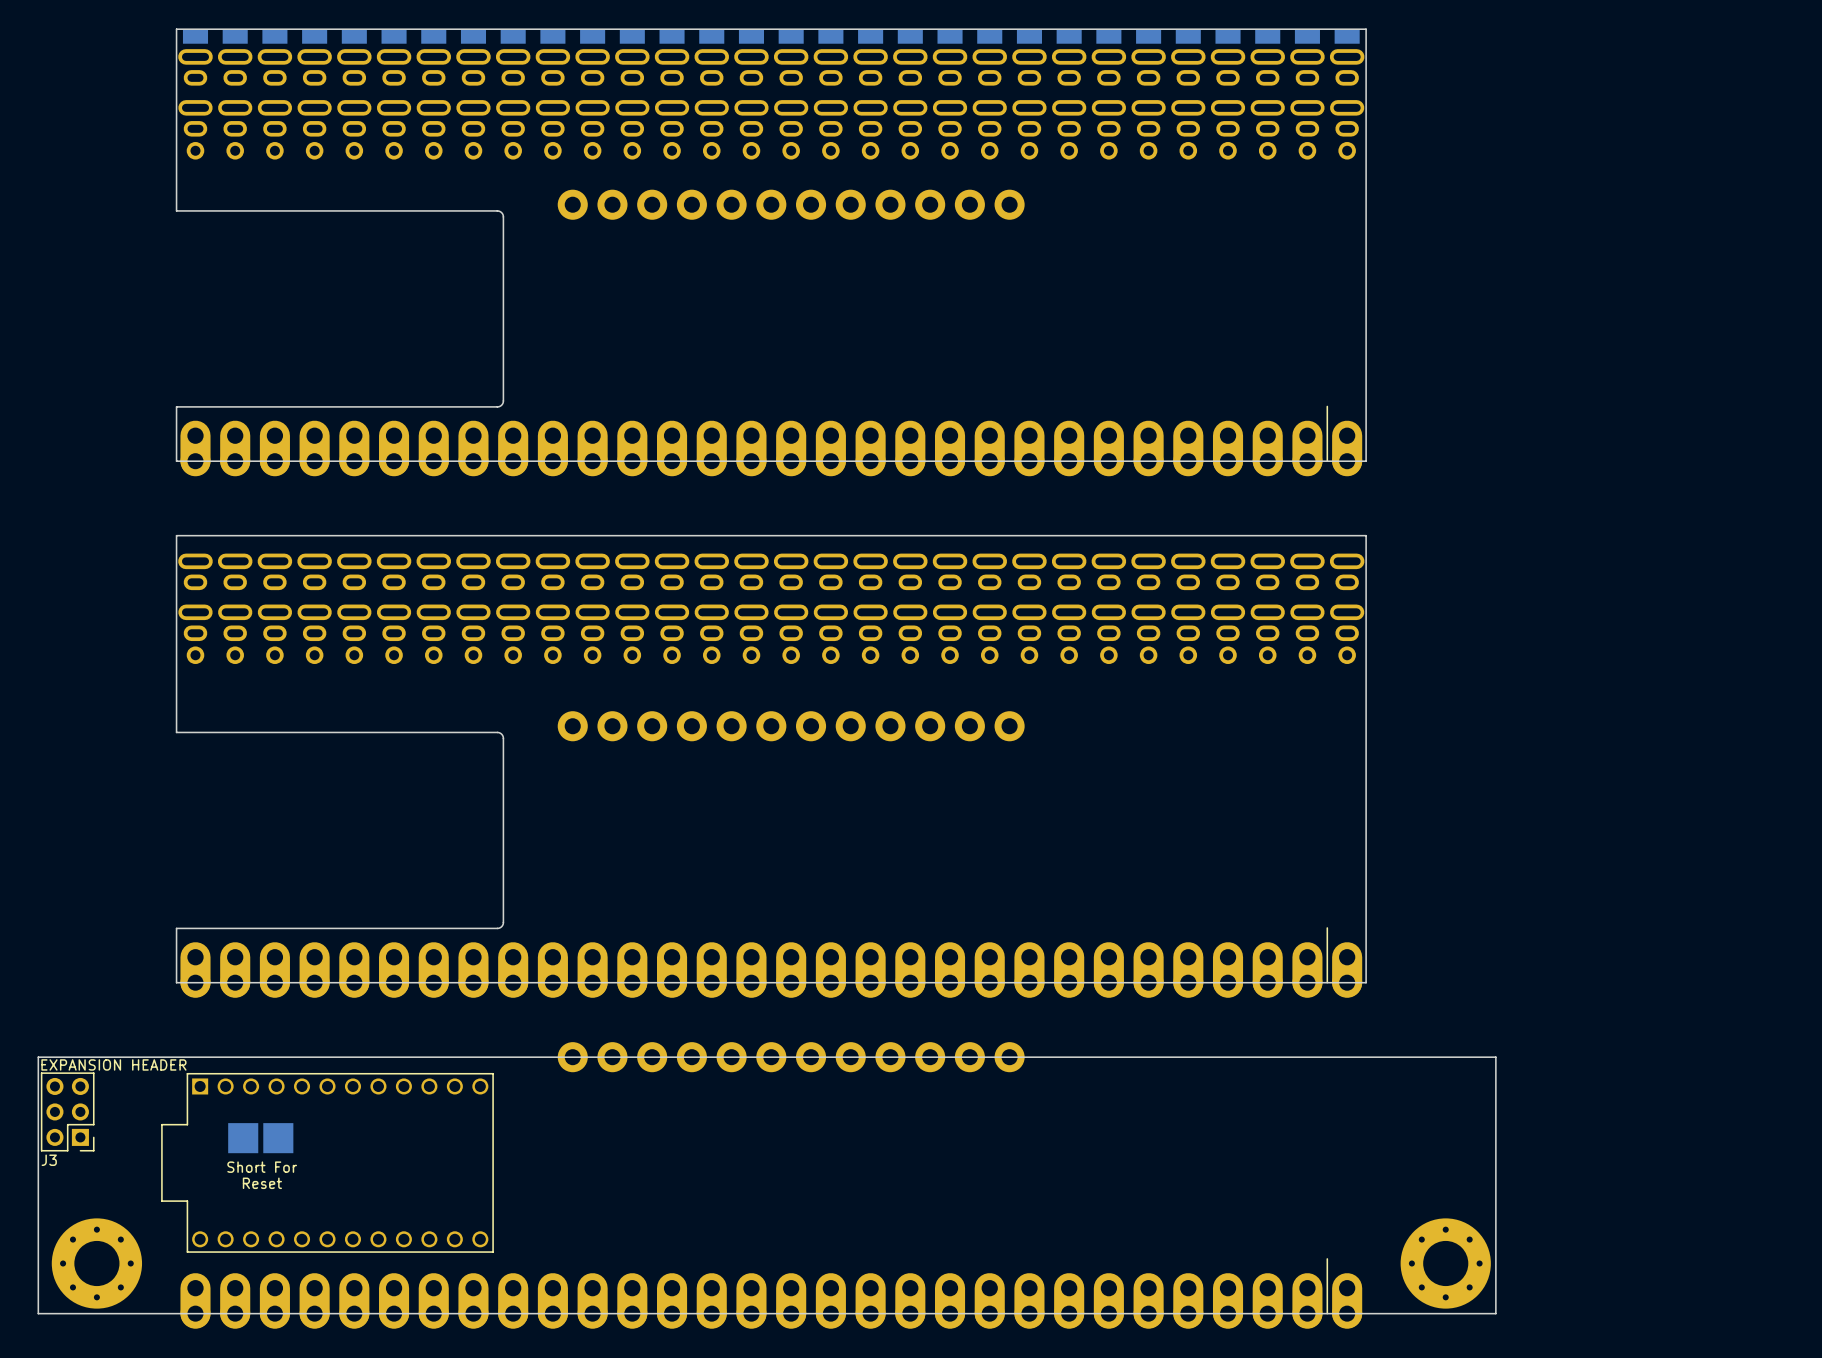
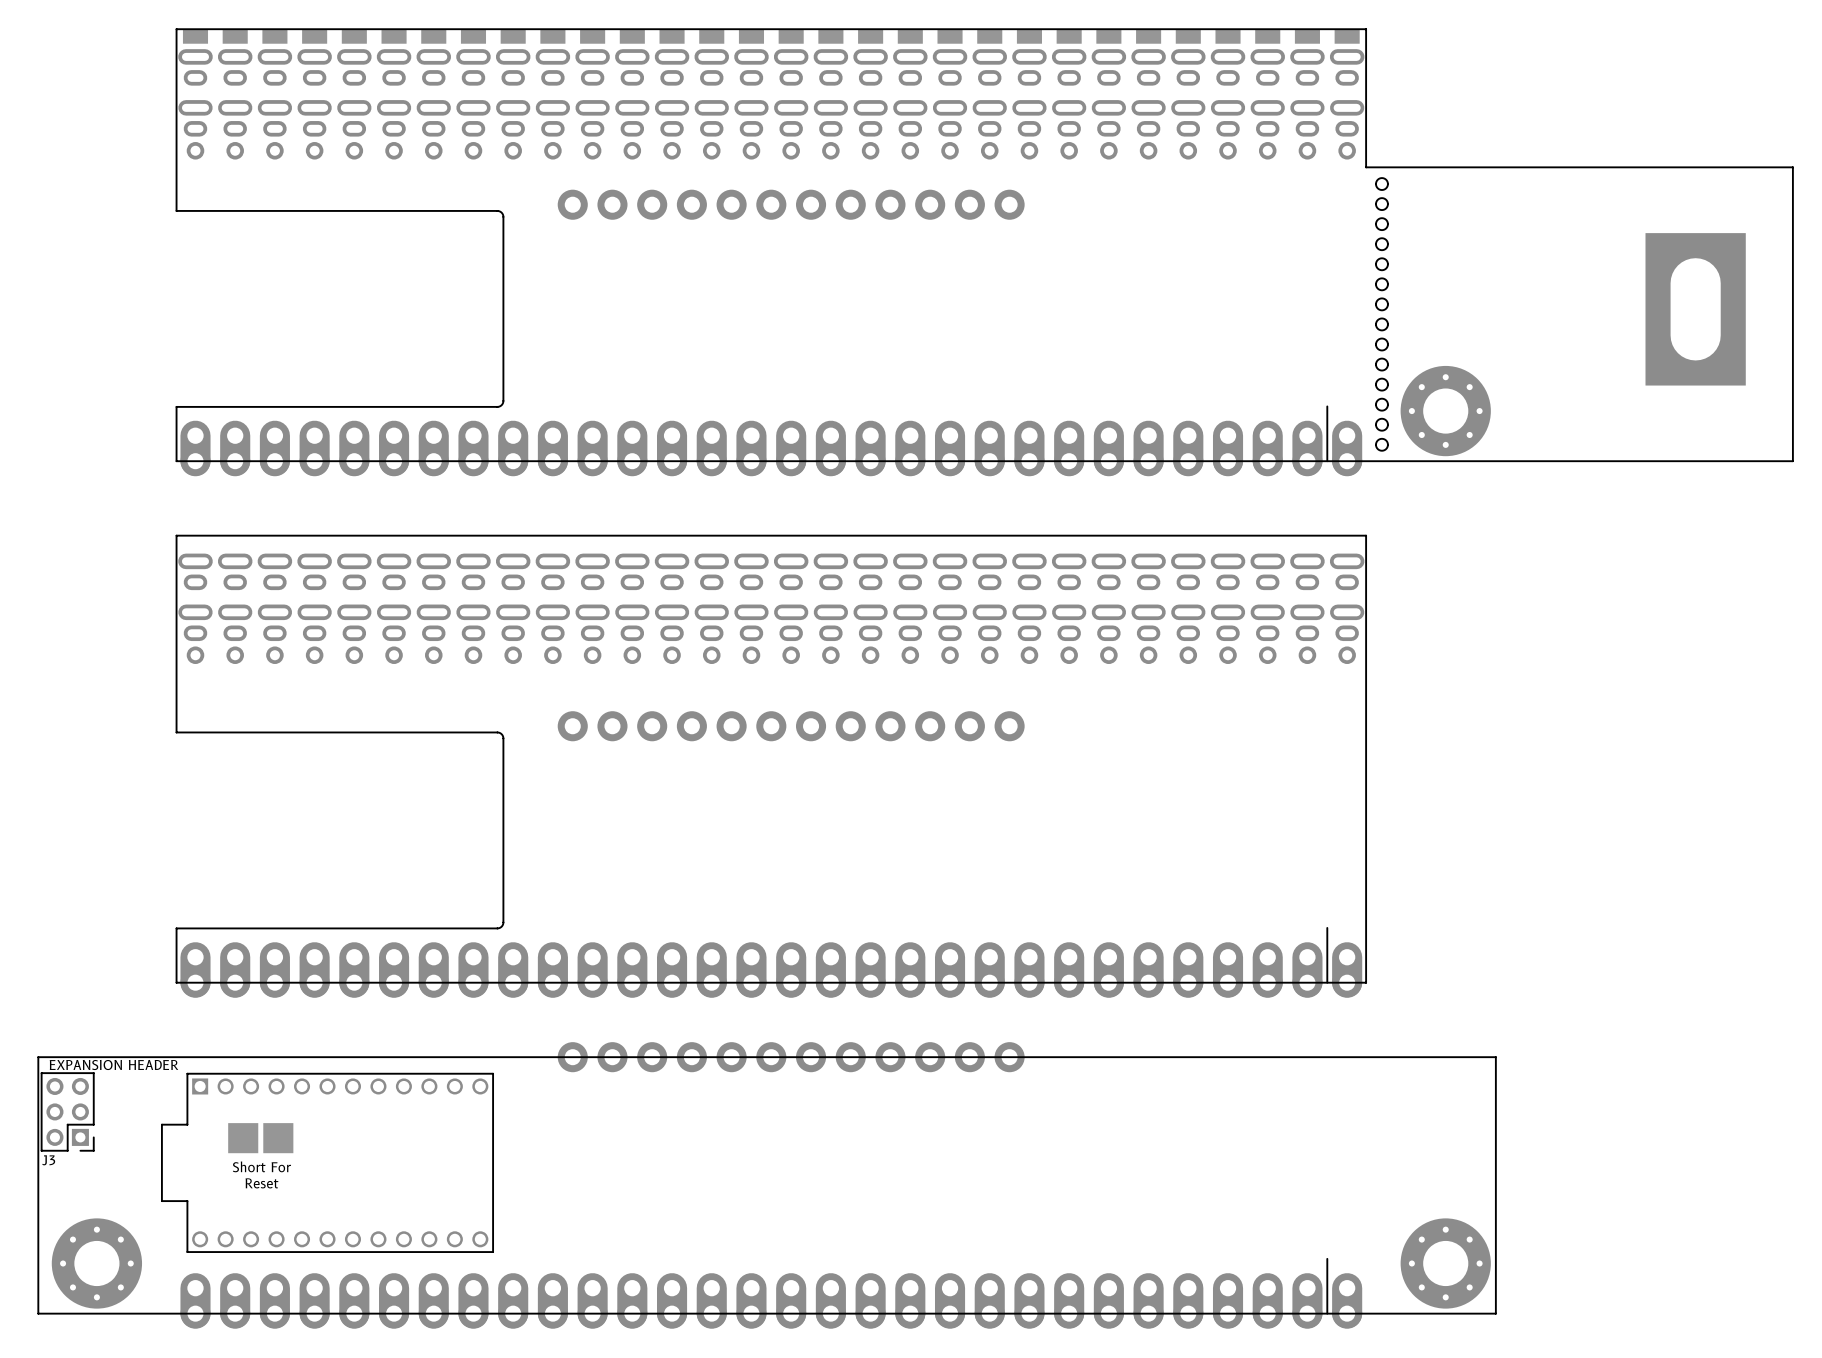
board edge: (1366, 167) (1366, 461) -> (1366, 167) (1792, 167) (1792, 461) (1366, 461)
board edge: none -> (1387, 184) (1386, 188) (1381, 190) (1377, 188) (1376, 184) (1377, 179) (1381, 178) (1386, 179) (1387, 184)
board edge: none -> (1387, 204) (1386, 208) (1381, 210) (1377, 208) (1376, 204) (1377, 199) (1381, 198) (1386, 199) (1387, 204)
board edge: none -> (1387, 224) (1386, 228) (1381, 230) (1377, 228) (1376, 224) (1377, 219) (1381, 218) (1386, 219) (1387, 224)
board edge: none -> (1387, 244) (1386, 248) (1381, 250) (1377, 248) (1376, 244) (1377, 239) (1381, 238) (1386, 239) (1387, 244)
board edge: none -> (1387, 264) (1386, 268) (1381, 270) (1377, 268) (1376, 264) (1377, 260) (1381, 258) (1386, 260) (1387, 264)
board edge: none -> (1387, 284) (1386, 288) (1381, 290) (1377, 288) (1376, 284) (1377, 280) (1381, 278) (1386, 280) (1387, 284)
board edge: none -> (1387, 304) (1386, 308) (1381, 310) (1377, 308) (1376, 304) (1377, 300) (1381, 298) (1386, 300) (1387, 304)
part: none -> (1695, 309)
board edge: none -> (1387, 324) (1386, 328) (1381, 330) (1377, 328) (1376, 324) (1377, 320) (1381, 318) (1386, 320) (1387, 324)
board edge: none -> (1387, 344) (1386, 348) (1381, 350) (1377, 348) (1376, 344) (1377, 340) (1381, 338) (1386, 340) (1387, 344)
board edge: none -> (1387, 364) (1386, 368) (1381, 370) (1377, 368) (1376, 364) (1377, 360) (1381, 358) (1386, 360) (1387, 364)
board edge: none -> (1387, 384) (1386, 388) (1381, 390) (1377, 388) (1376, 384) (1377, 380) (1381, 378) (1386, 380) (1387, 384)
board edge: none -> (1387, 404) (1386, 408) (1381, 410) (1377, 408) (1376, 404) (1377, 400) (1381, 398) (1386, 400) (1387, 404)
part: none -> (1445, 411)
board edge: none -> (1387, 424) (1386, 428) (1381, 430) (1377, 428) (1376, 424) (1377, 420) (1381, 418) (1386, 420) (1387, 424)
board edge: none -> (1387, 444) (1386, 440) (1381, 438) (1377, 440) (1376, 444) (1377, 449) (1381, 450) (1386, 449) (1387, 444)

